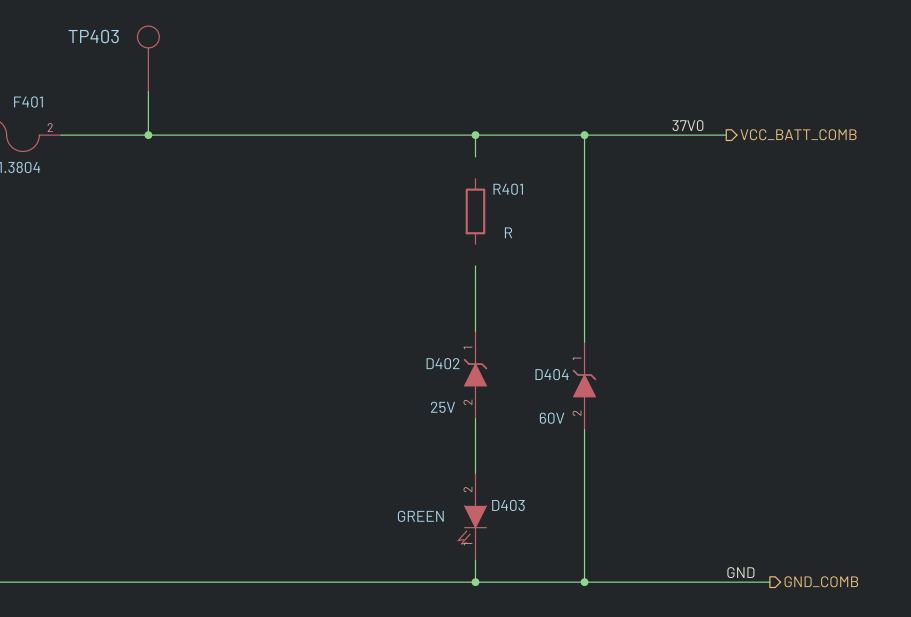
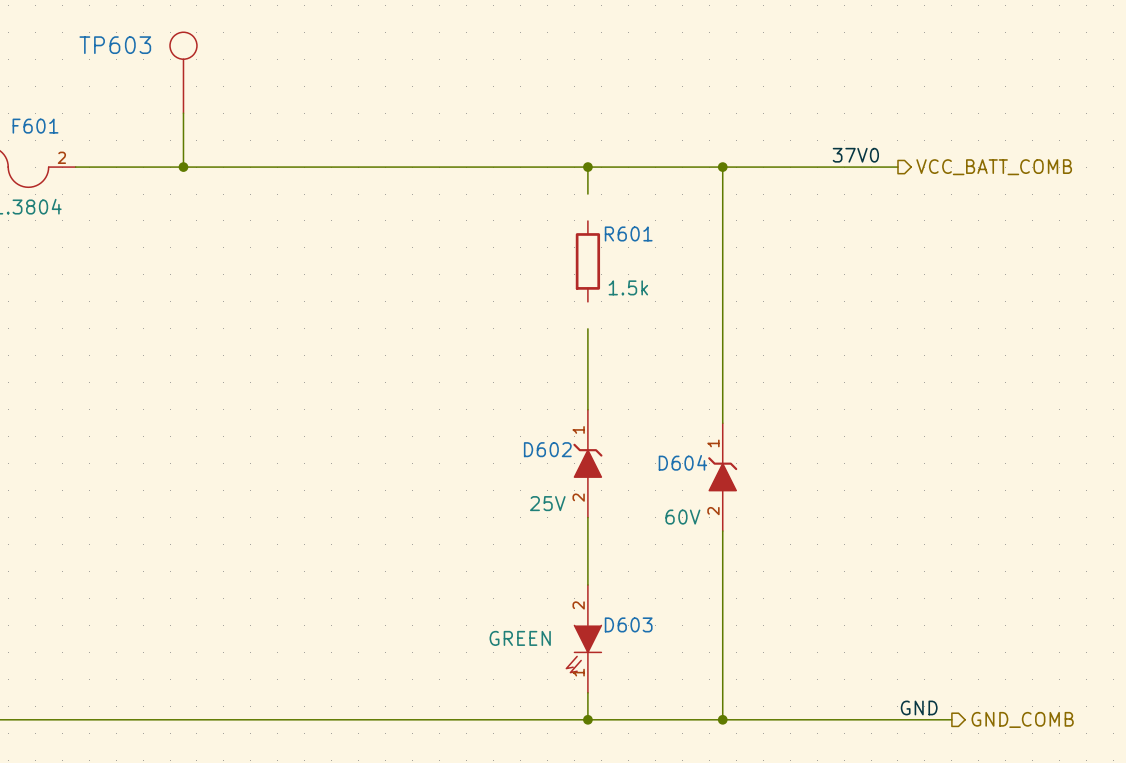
TP403 name: TP403 (93, 36) -> TP603 (115, 45)
F401 name: F401 (28, 102) -> F601 (35, 126)
R401 name: R401 (508, 189) -> R601 (628, 233)
R401 value: R (508, 232) -> 1.5k (628, 287)
D402 name: D402 (443, 363) -> D602 (547, 449)
D404 name: D404 (552, 374) -> D604 (682, 462)
D403 name: D403 (508, 505) -> D603 (628, 624)

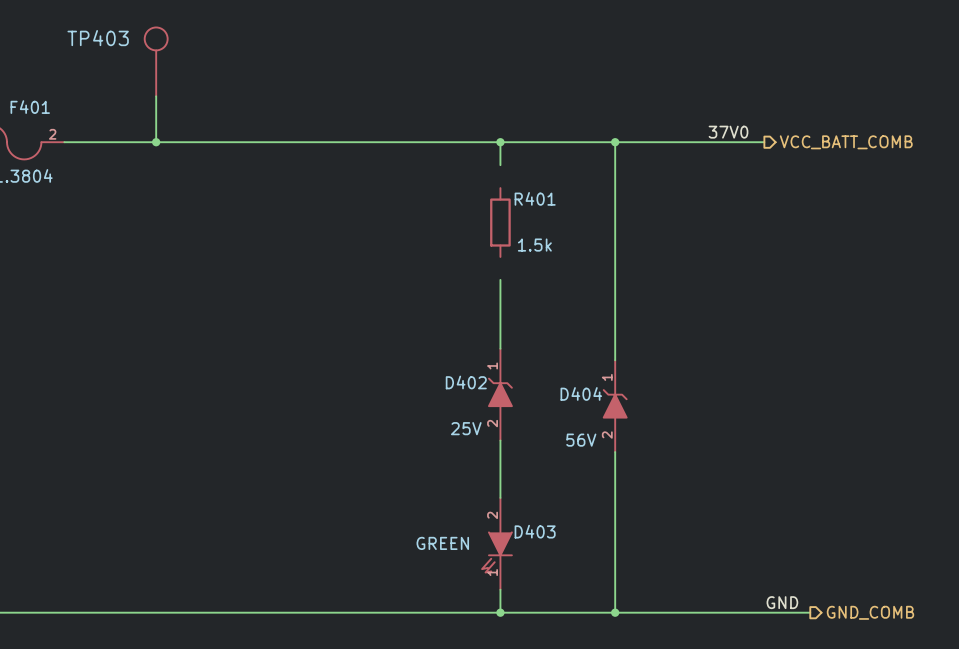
TP603 name: TP603 (115, 45) -> TP403 (98, 38)
F601 name: F601 (35, 126) -> F401 (30, 107)
R601 name: R601 (628, 233) -> R401 (535, 198)
D602 name: D602 (547, 449) -> D402 (466, 382)
D604 name: D604 (682, 462) -> D404 (581, 393)
D604 value: 60V (682, 517) -> 56V (581, 440)
D603 name: D603 (628, 624) -> D403 (535, 531)

